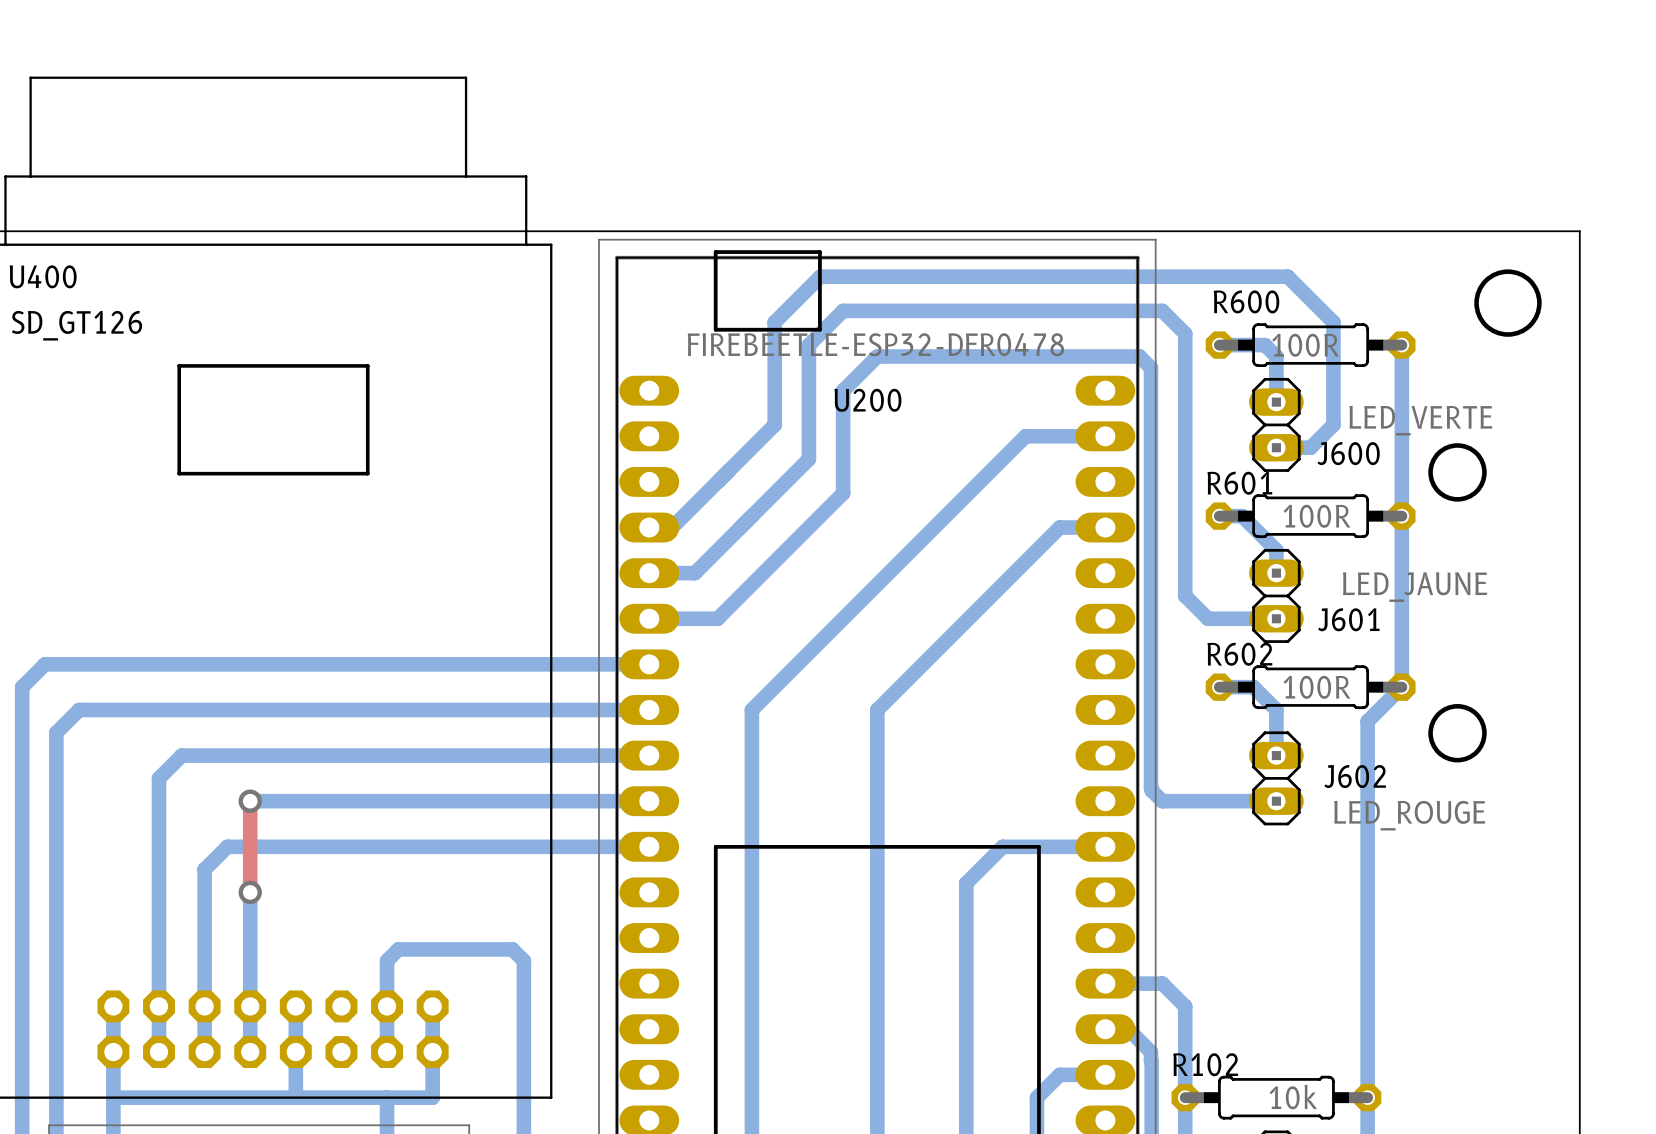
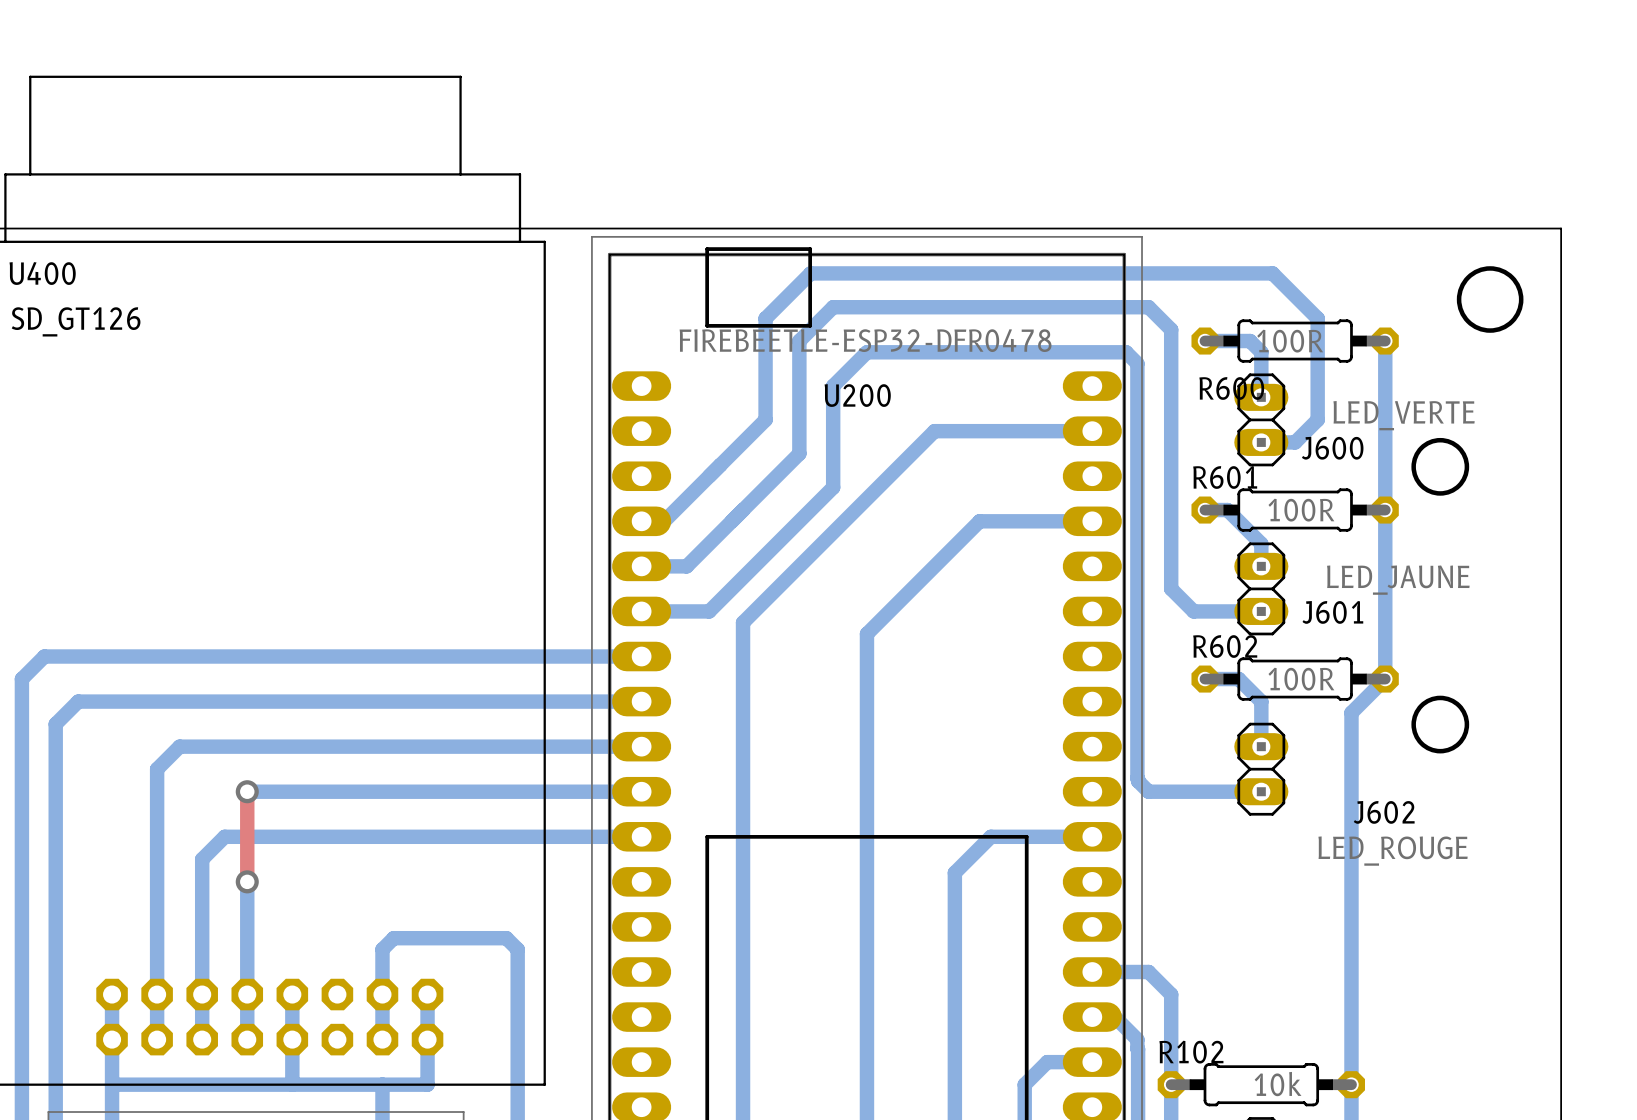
R600 name position: R600 (1246, 301) -> R600 (1231, 388)
board edge: (179, 365) (367, 365) (367, 473) (179, 473) (179, 365) -> none
bottom track: (1025, 436) (751, 709) -> (1013, 431) (934, 431) (743, 622) (743, 701)
bottom track: (1059, 527) (877, 709) -> (1047, 521) (979, 521) (866, 633) (866, 701)
J602 name position: J602 (1355, 776) -> J602 (1384, 812)
J602 value position: LED_ROUGE (1409, 815) -> LED_ROUGE (1393, 851)

